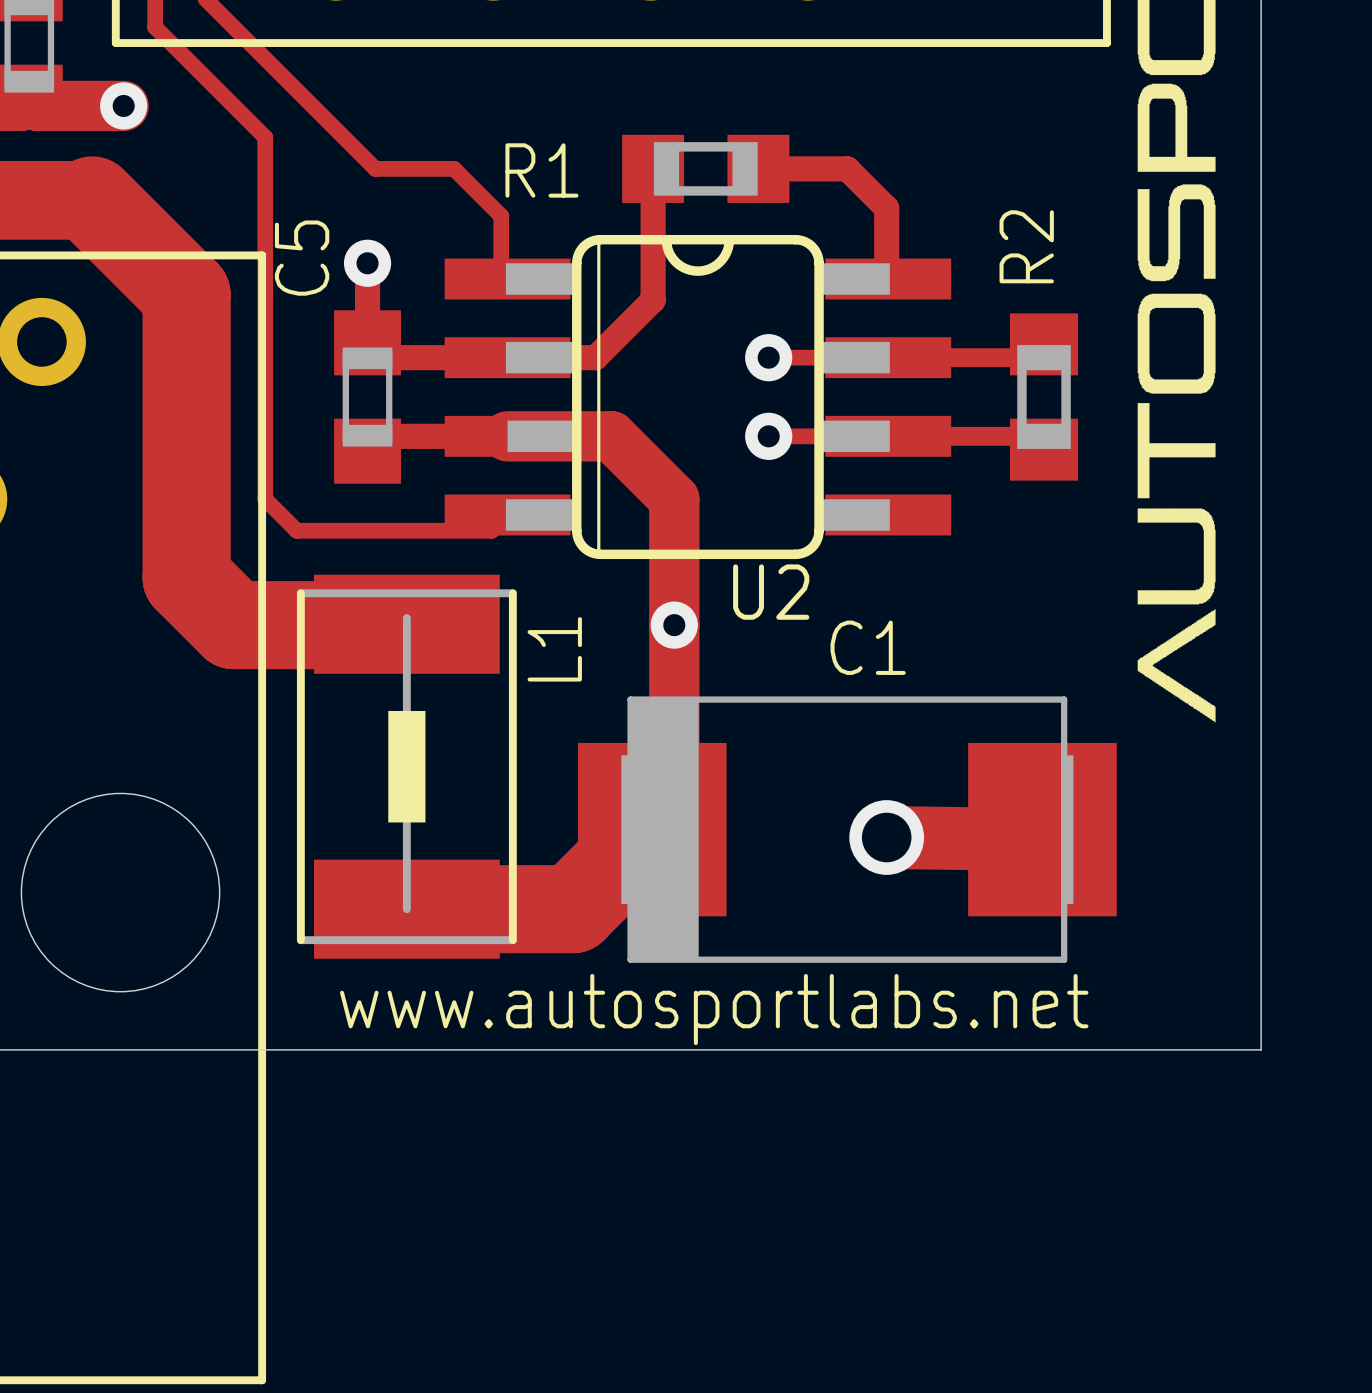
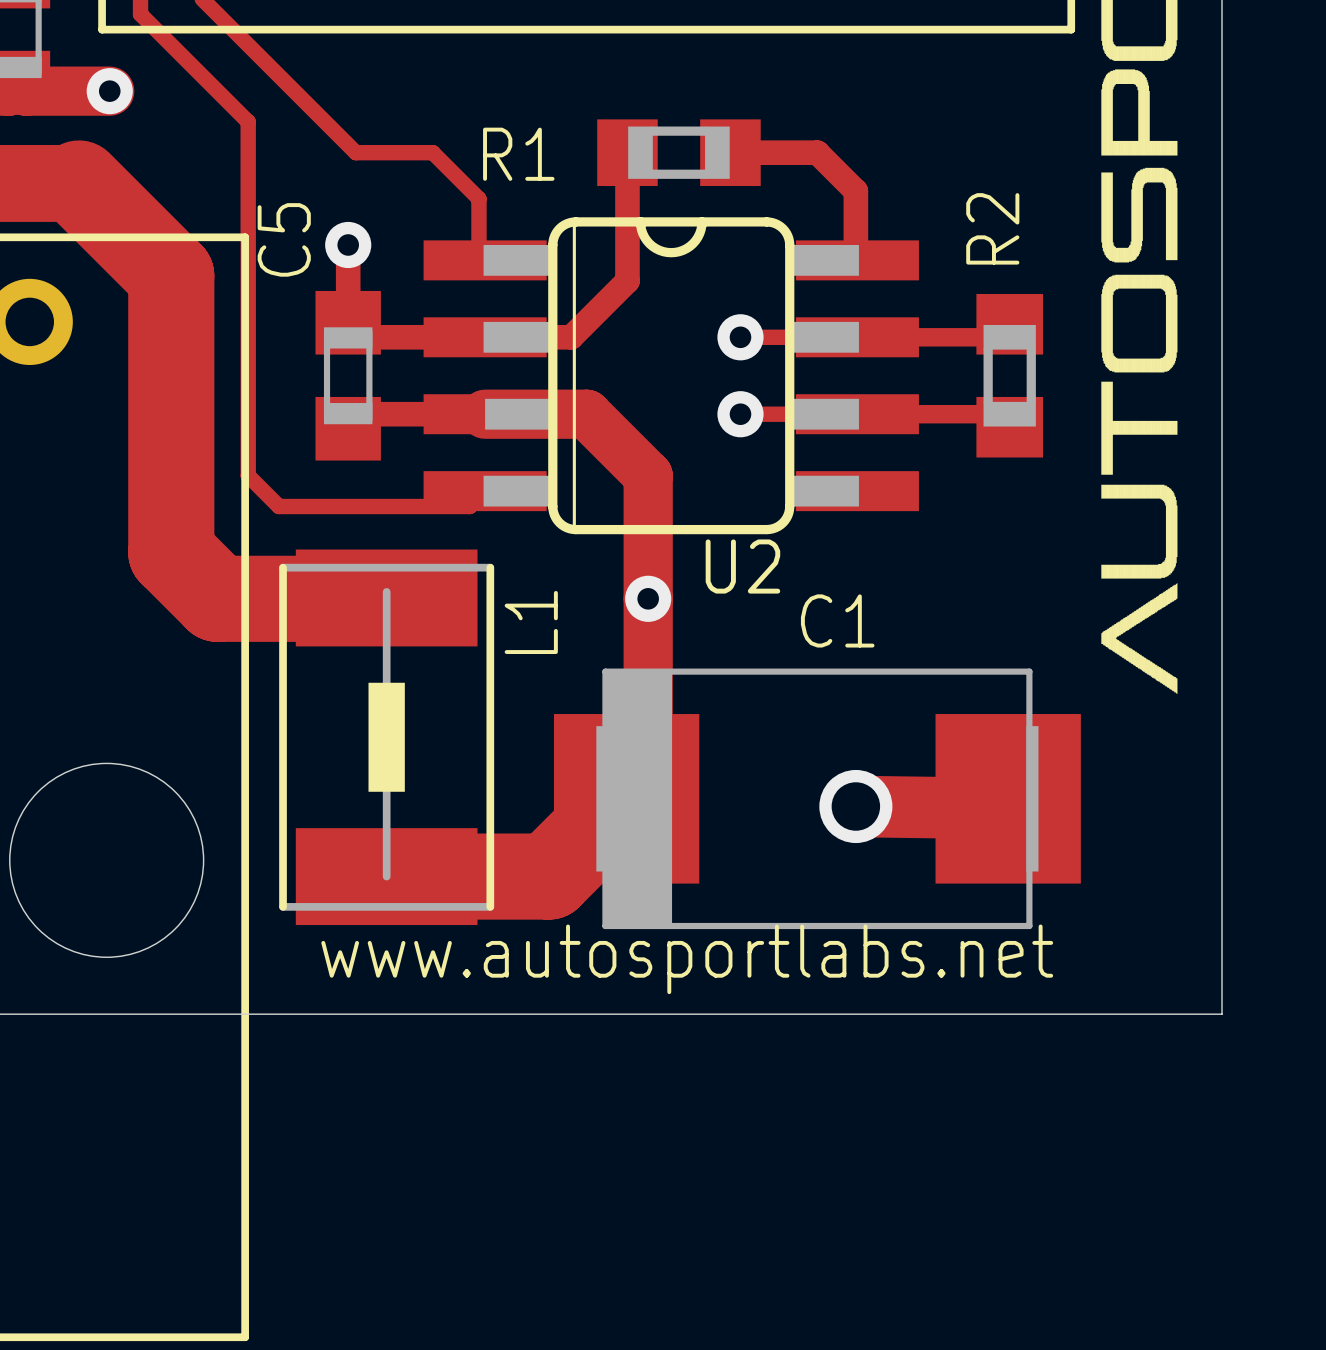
text position: www.autosportlabs.net (714, 1009) -> www.autosportlabs.net (687, 959)

